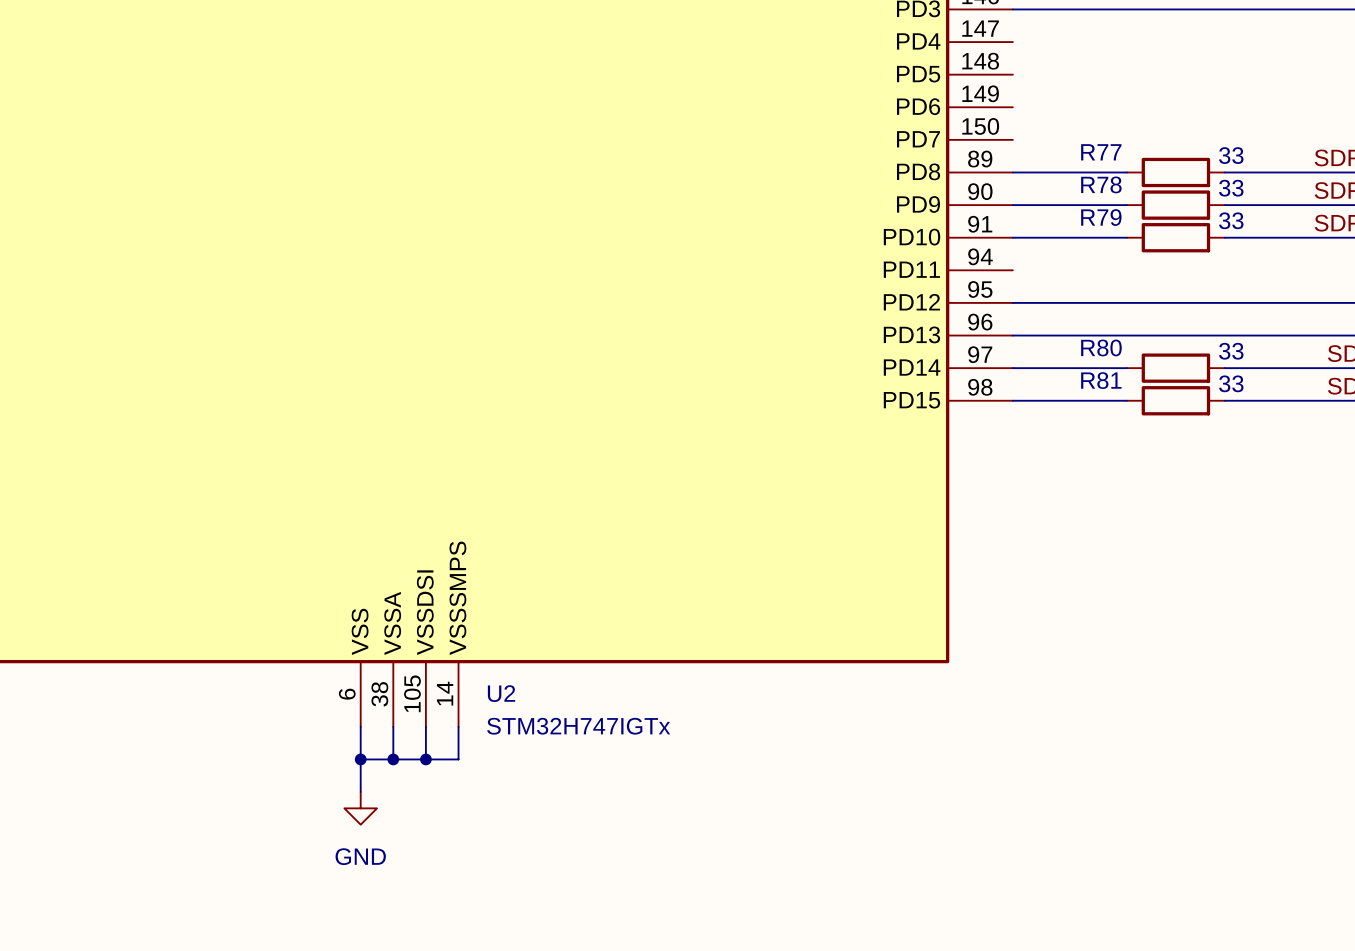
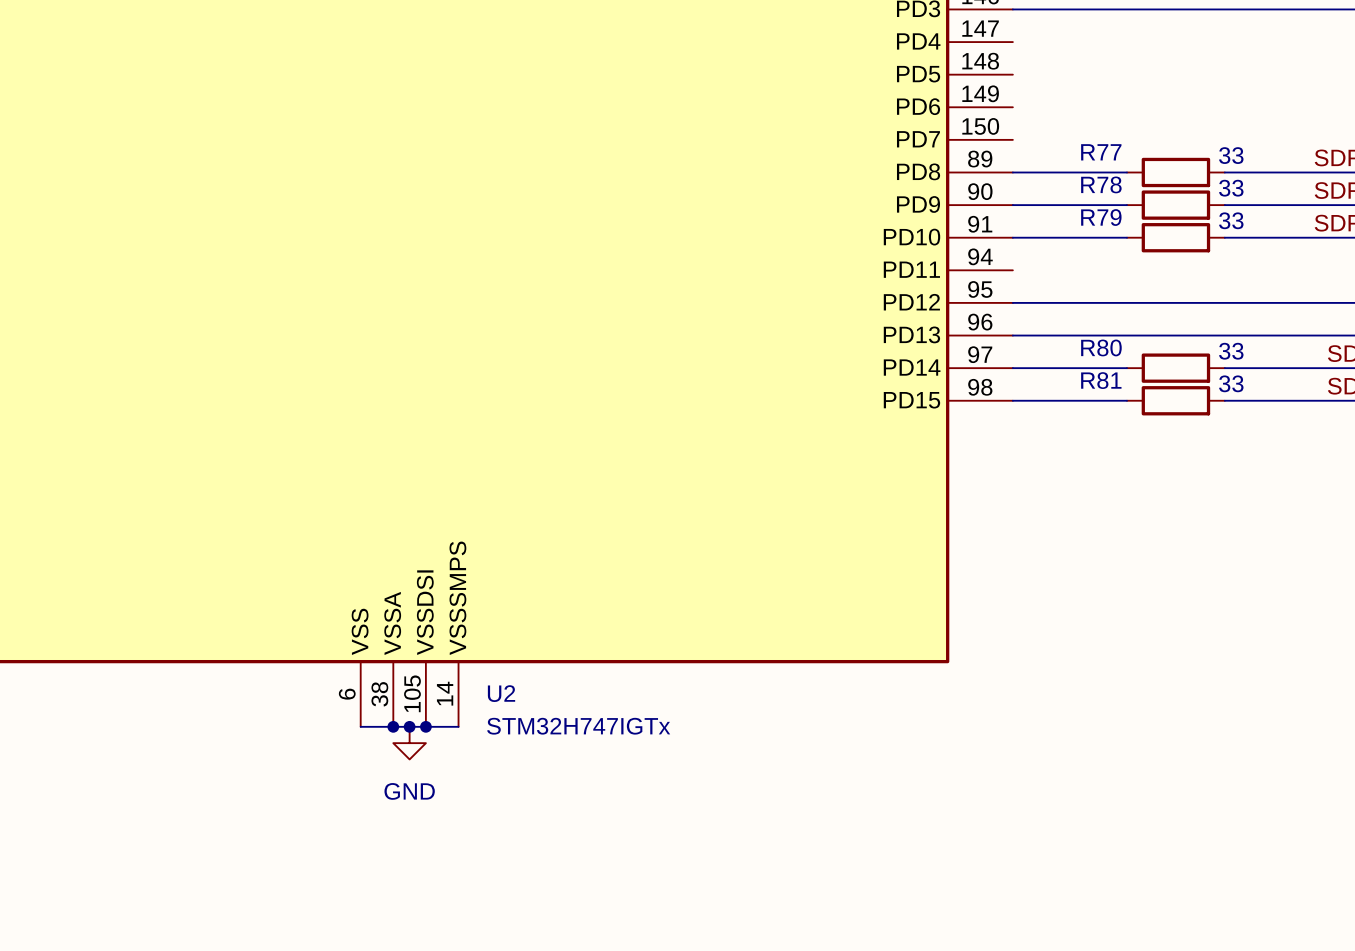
wire: (360, 726) (360, 792) -> none
wire: (393, 726) (393, 759) -> none
junction: none -> (393, 726)
junction: none -> (409, 726)
wire: (425, 726) (425, 759) -> none
junction: none -> (425, 726)
wire: (458, 726) (458, 759) (360, 759) -> (458, 726) (360, 726)
junction: (360, 759) -> none
junction: (393, 759) -> none
junction: (425, 759) -> none
power symbol position: GND (360, 808) -> GND (409, 743)

